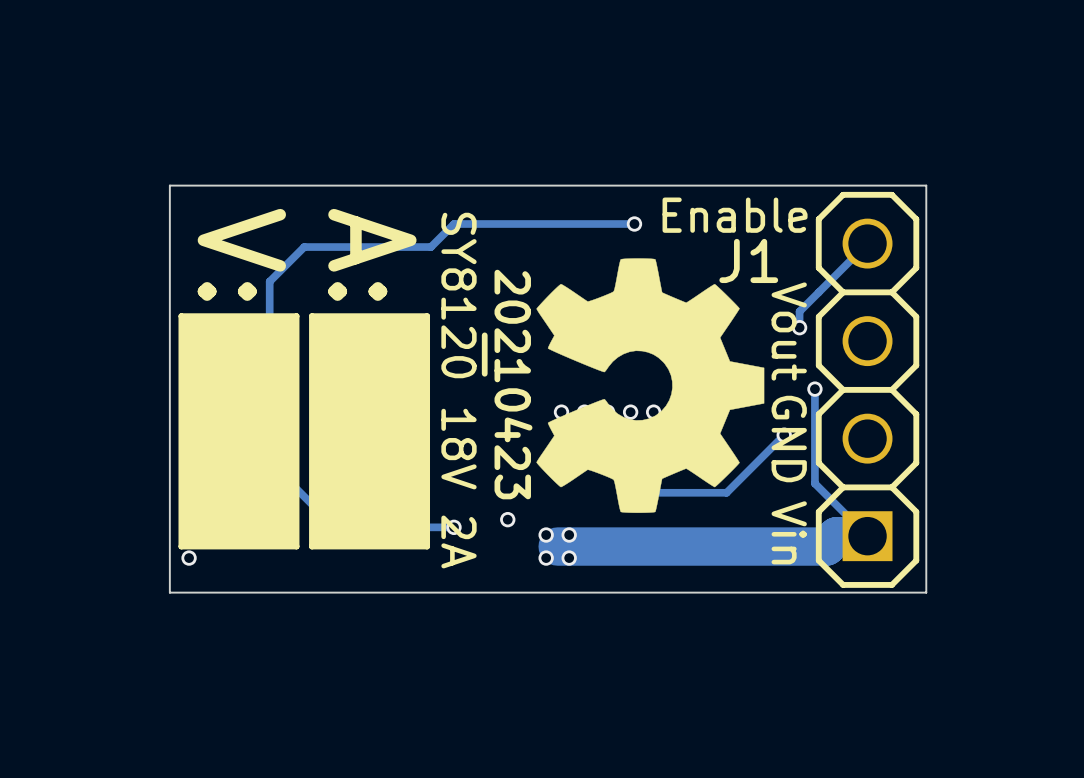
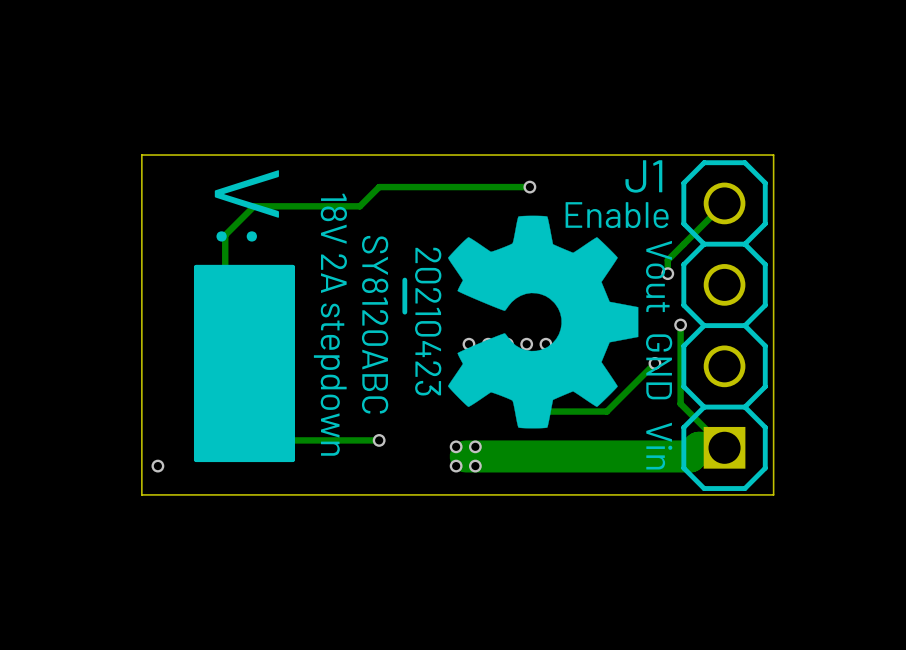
text position: Enable (735, 215) -> Enable (617, 215)
J1 name position: J1 (748, 260) -> J1 (643, 176)
drawing: [178, 313, 431, 550] -> none
drawing: none -> [193, 264, 295, 463]
text: none -> 18V 2A stepdown (330, 324)
text: SY8120 18V 2A (458, 390) -> SY8120ABC (375, 324)
via: (507, 519) -> none

